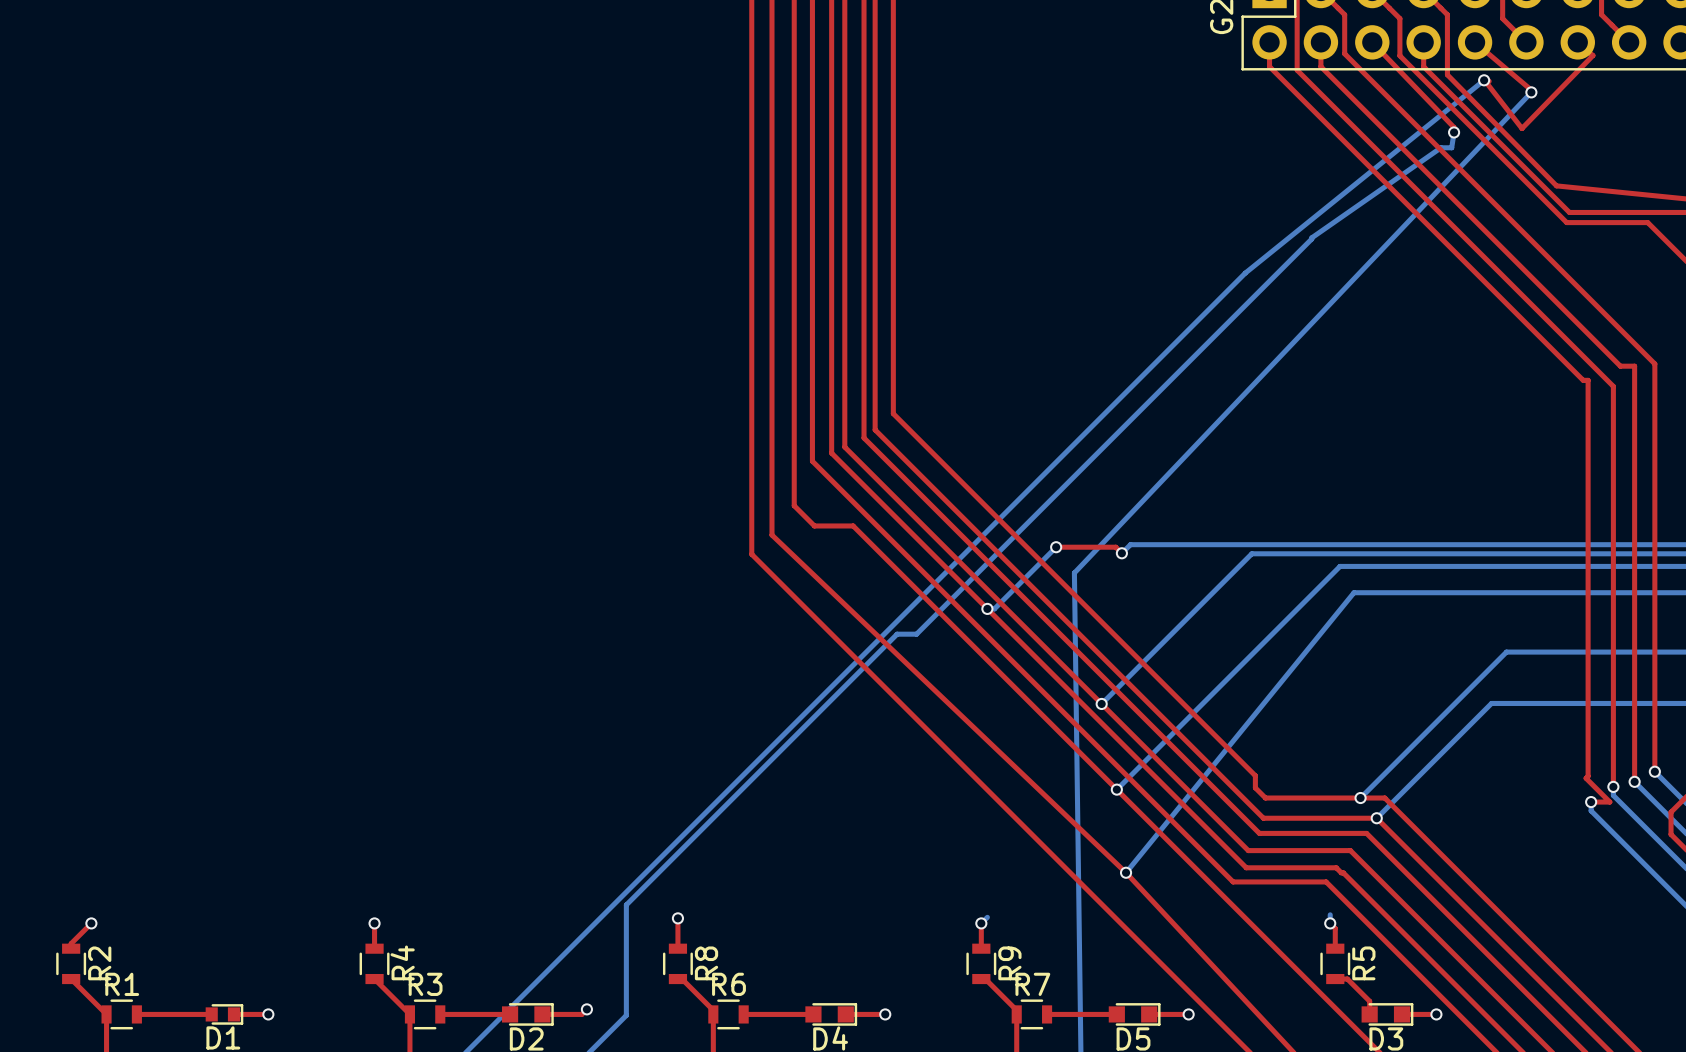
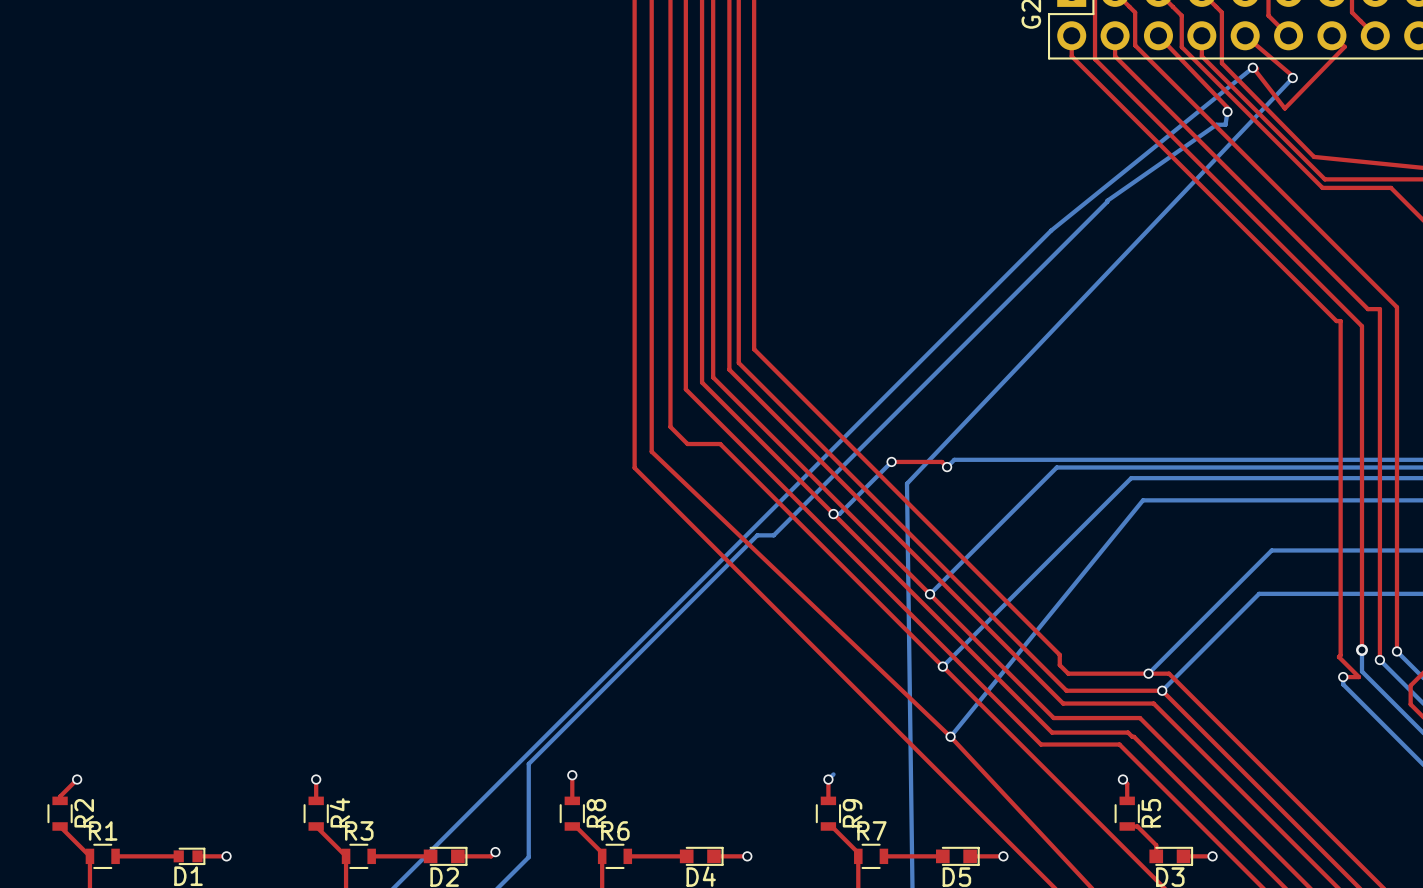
top track: (1613, 770) (1613, 786) -> none
bottom track: none -> (1361, 650) (1361, 664)
via: none -> (1361, 650)
via: (1613, 786) -> none
bottom track: (1330, 914) (1330, 923) -> none

